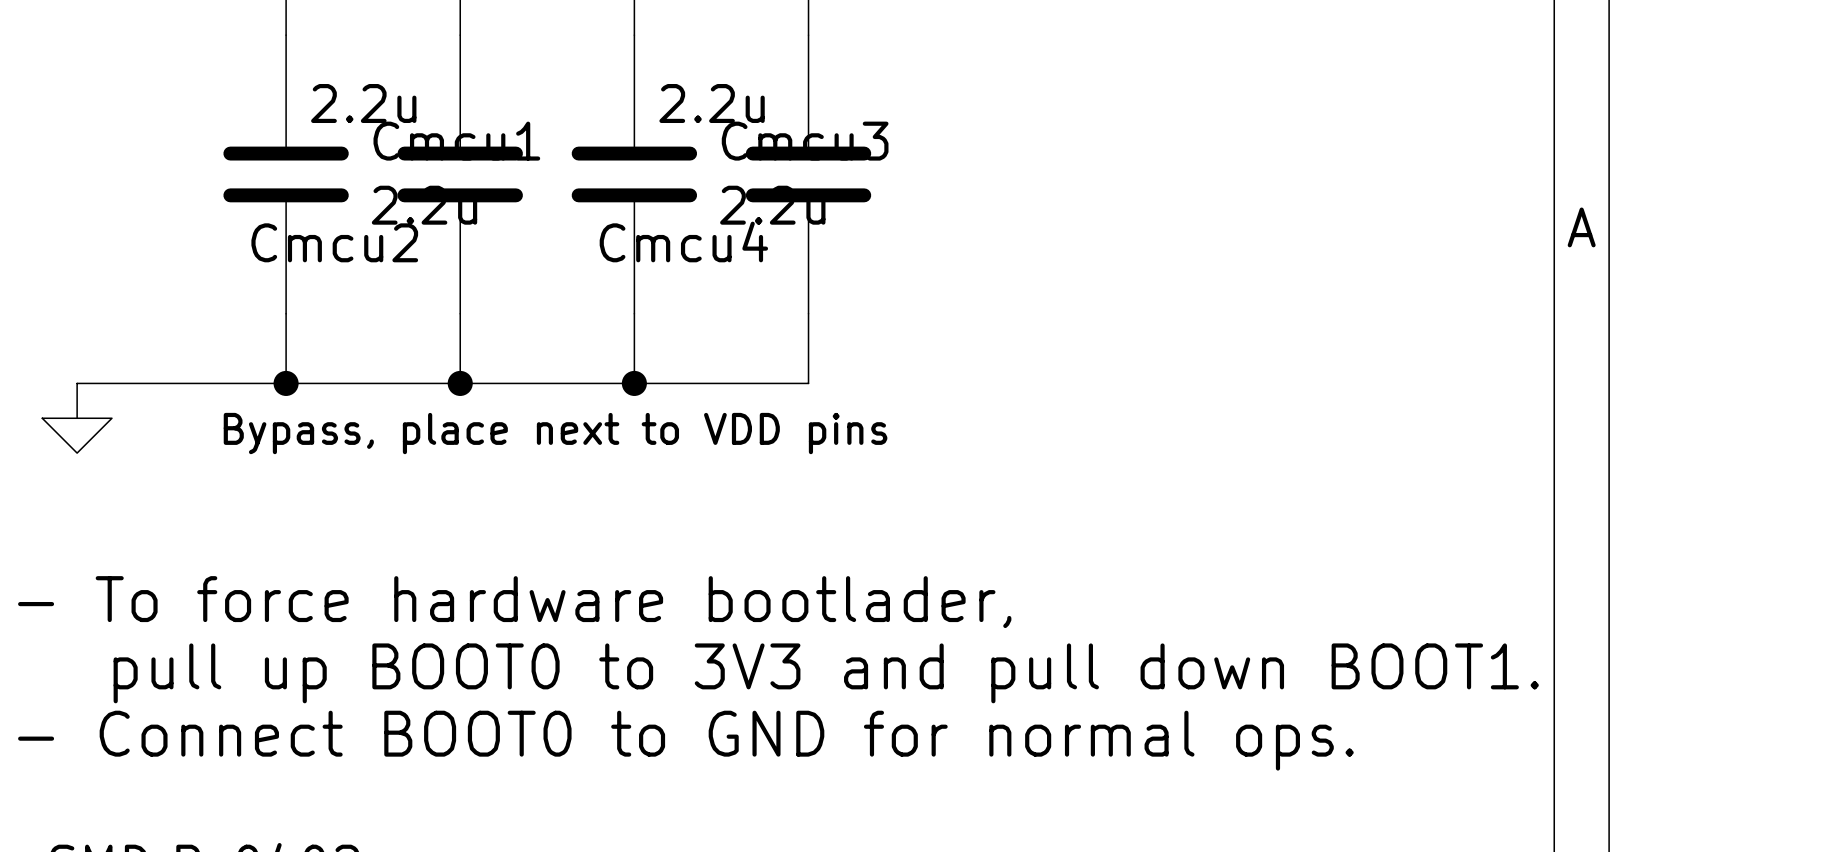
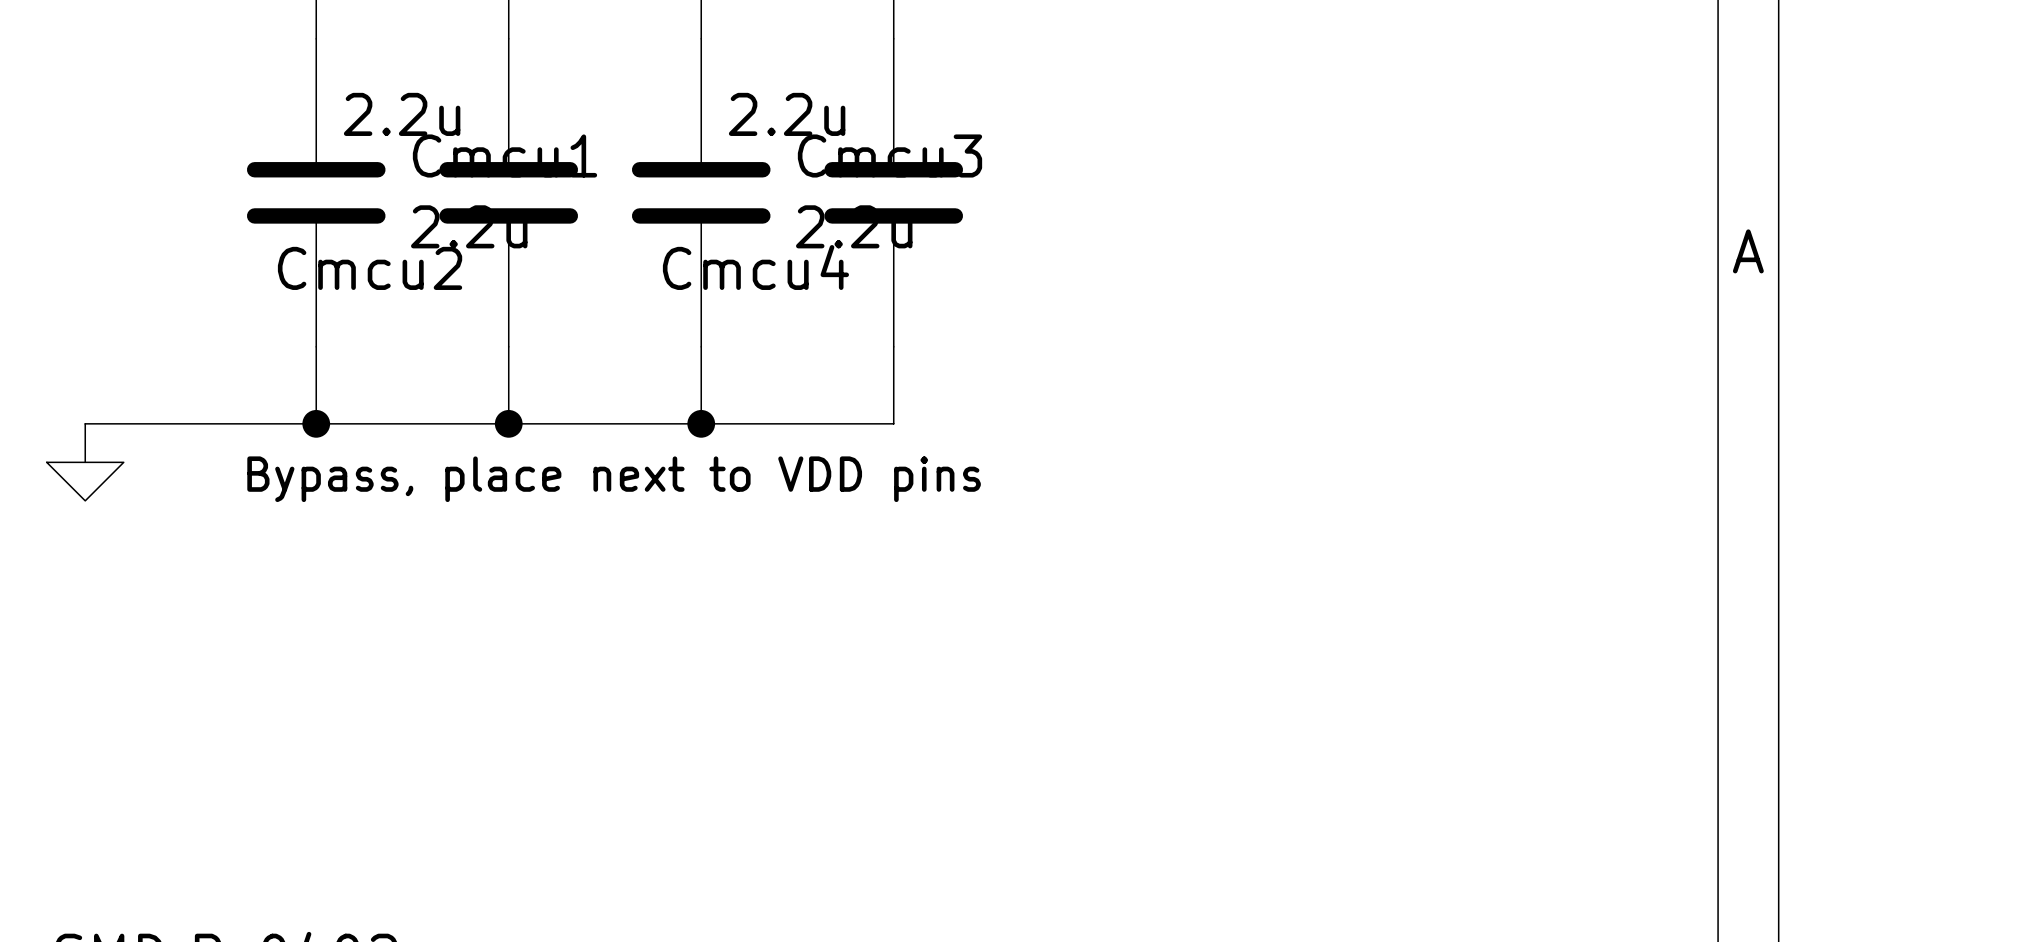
text: - To force hardware bootlader, (514, 602) -> none
text: pull up BOOT0 to 3V3 and pull down BOOT1. (826, 673) -> none
text: - Connect BOOT0 to GND for normal ops. (685, 740) -> none

